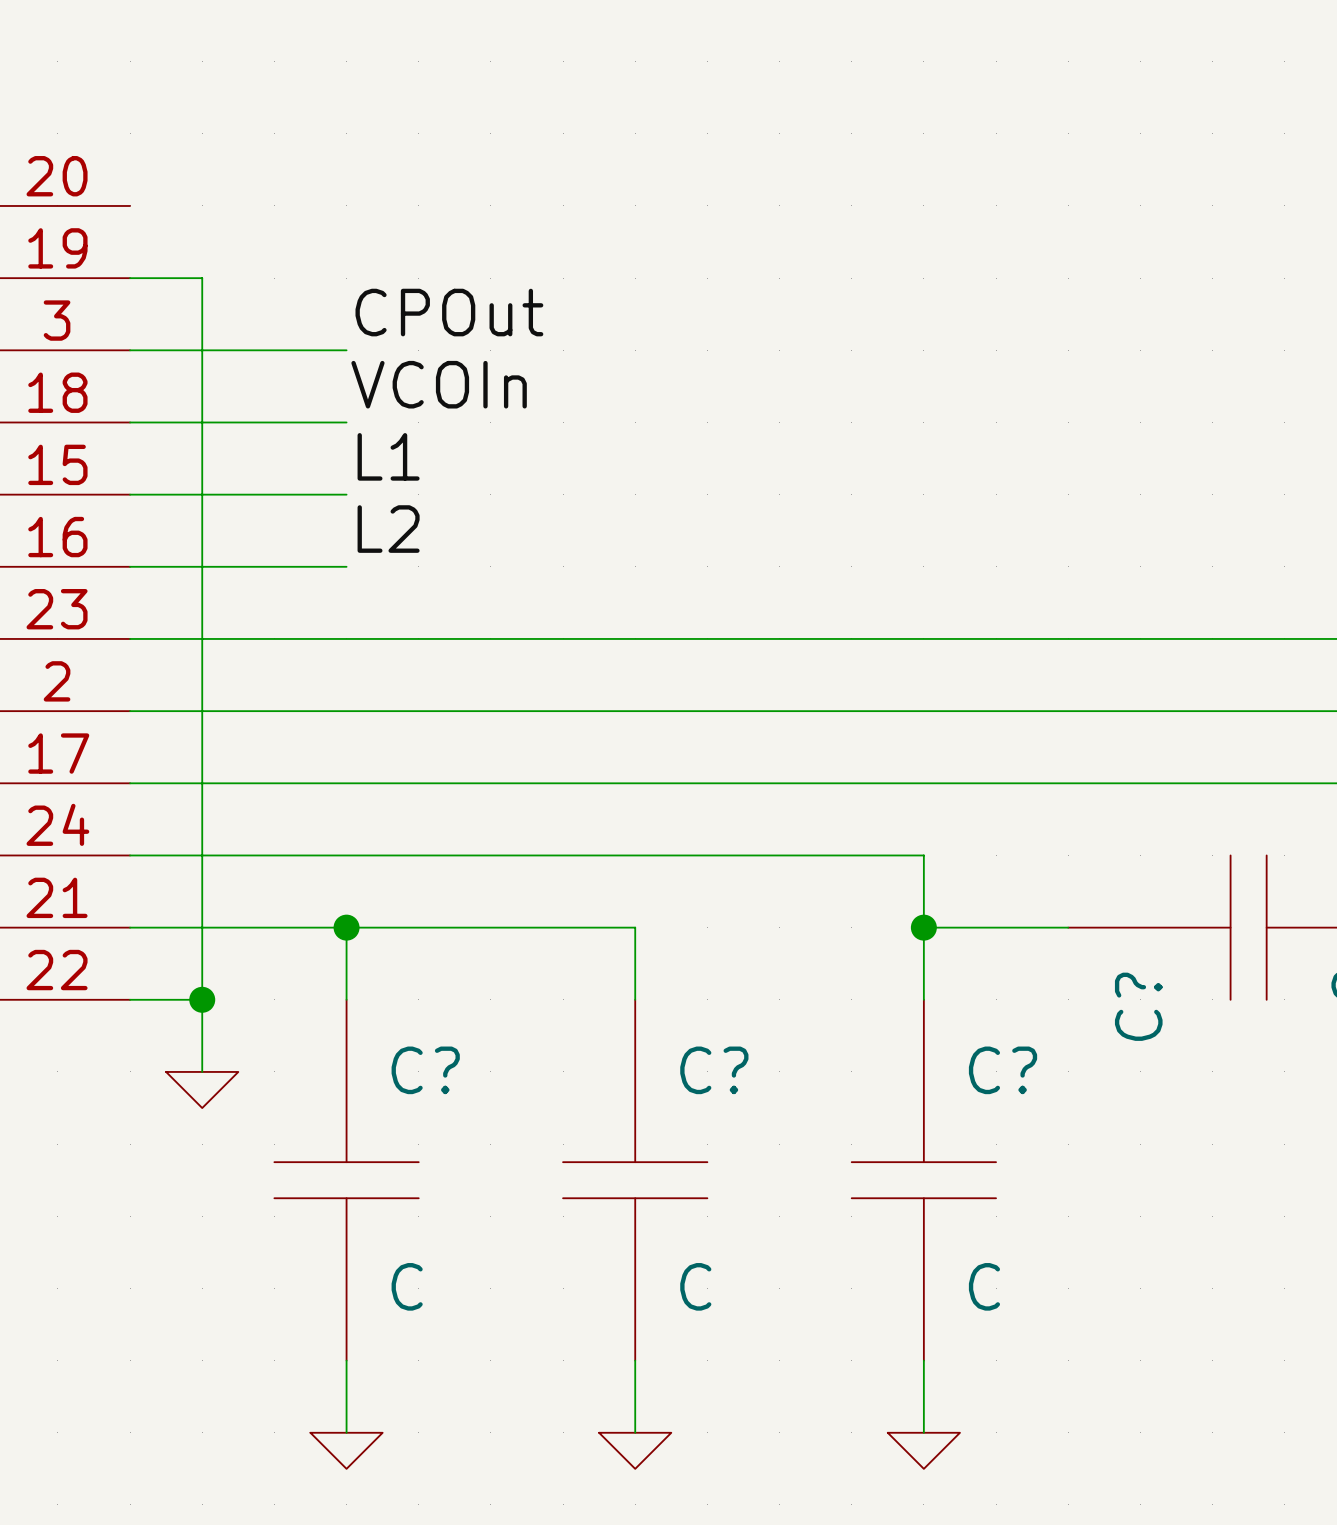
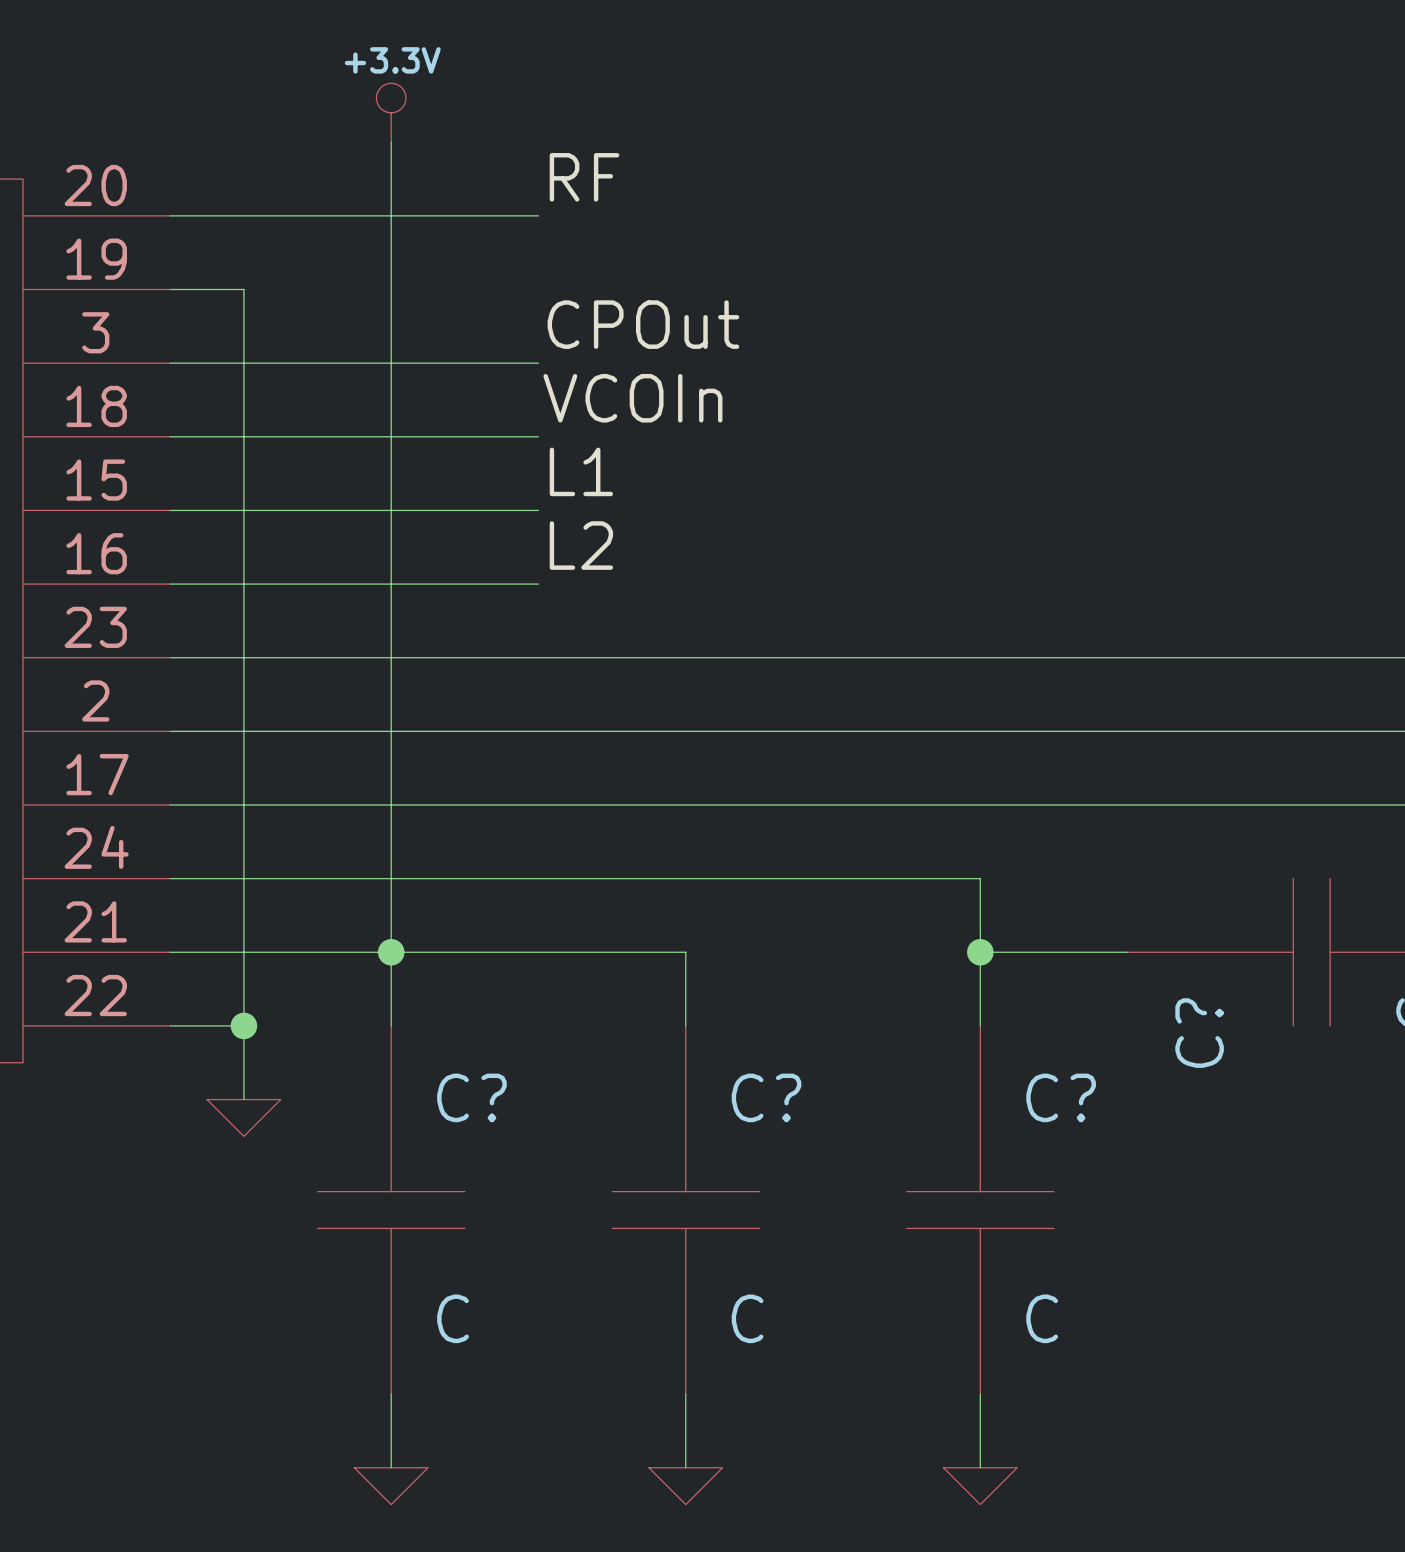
power symbol: none -> +3.3V (391, 112)
wire: none -> (391, 142) (391, 952)
label: none -> RF (584, 177)
wire: none -> (170, 215) (538, 215)
label position: CPOut (449, 312) -> CPOut (643, 324)
wire: none -> (391, 363) (538, 363)
label position: VCOIn (439, 384) -> VCOIn (632, 398)
wire: none -> (391, 436) (538, 436)
label position: L1 (388, 456) -> L1 (581, 471)
wire: none -> (391, 510) (538, 510)
label position: L2 (388, 529) -> L2 (581, 545)
wire: none -> (391, 584) (538, 584)

